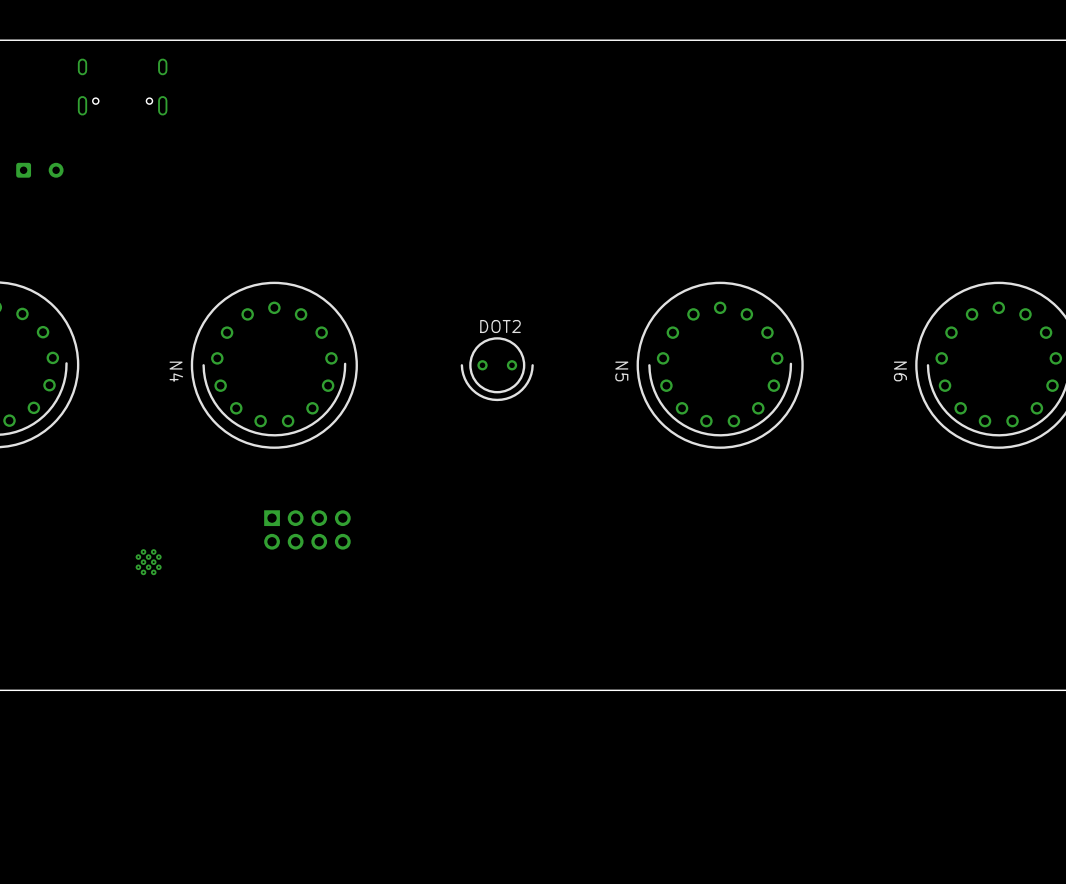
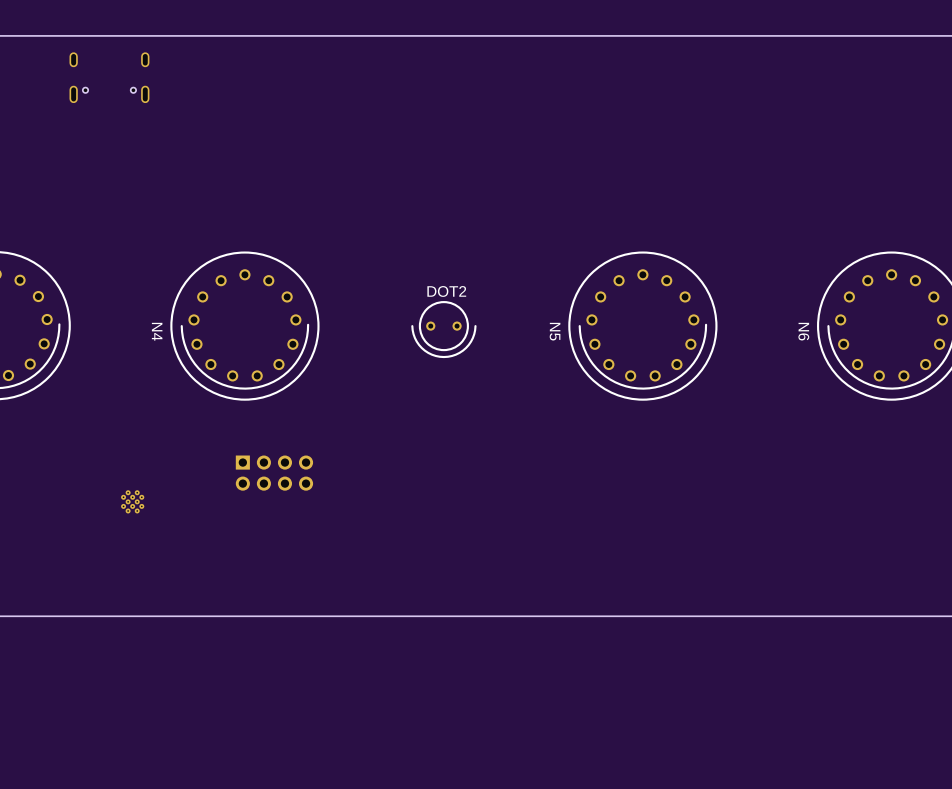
part: (39, 170) -> none

